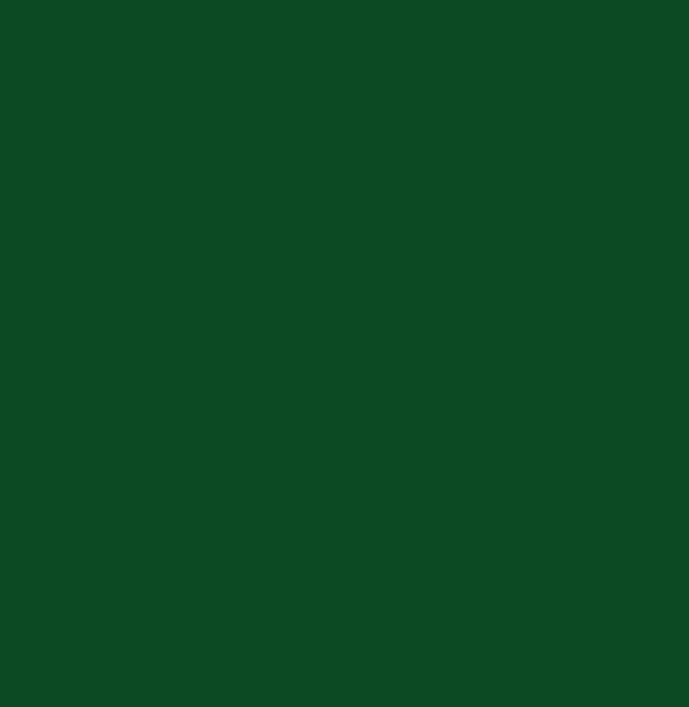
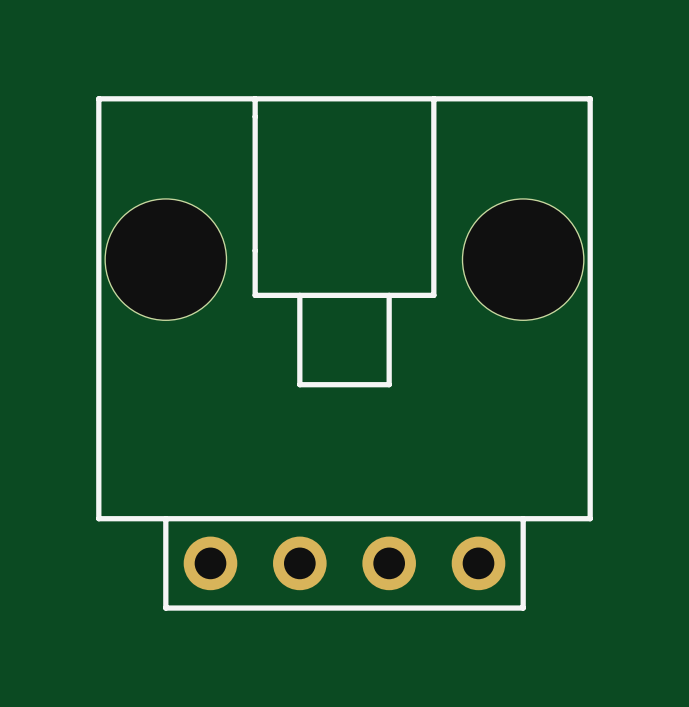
part: none -> (344, 353)

